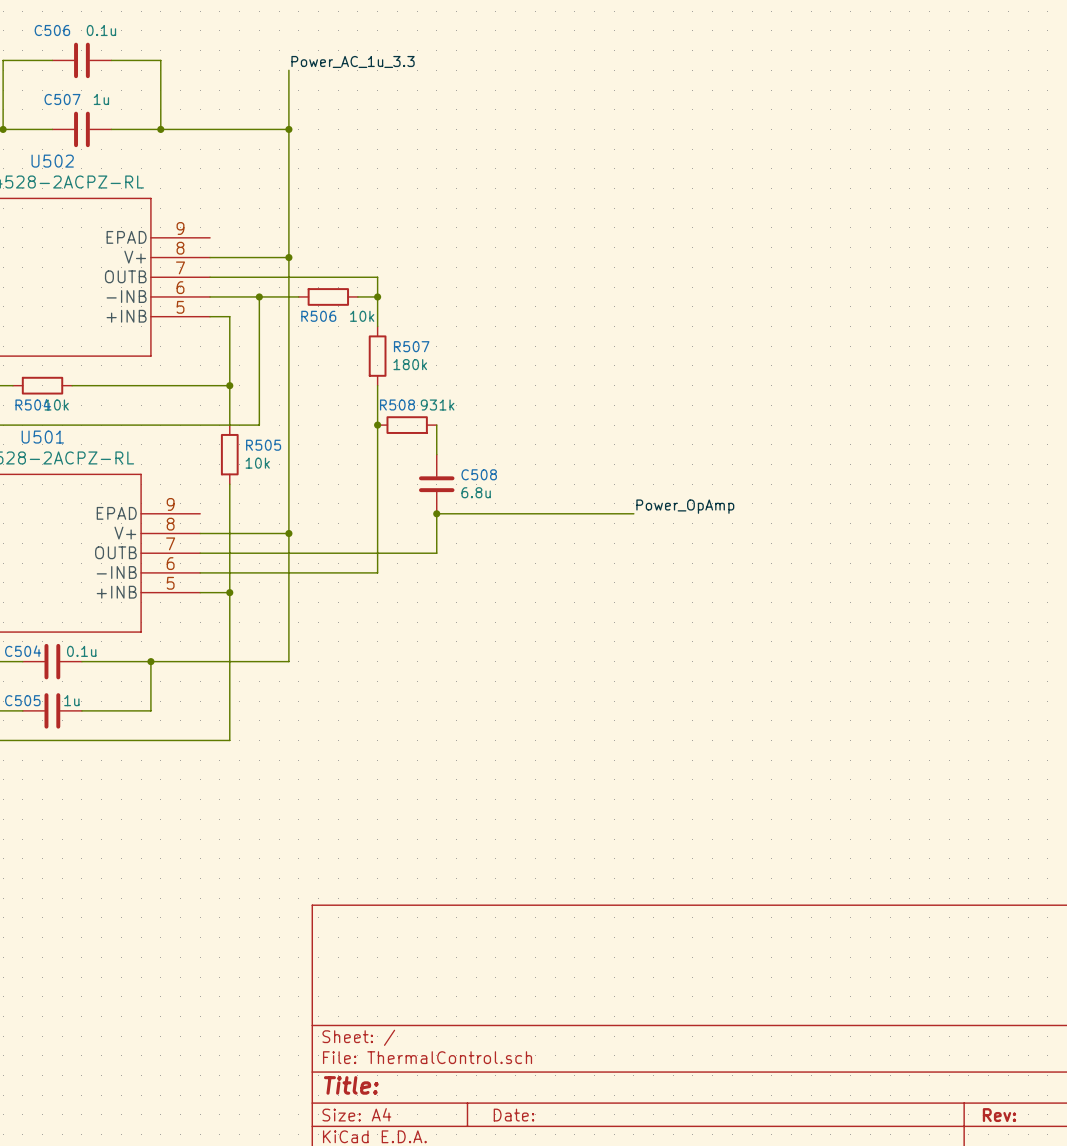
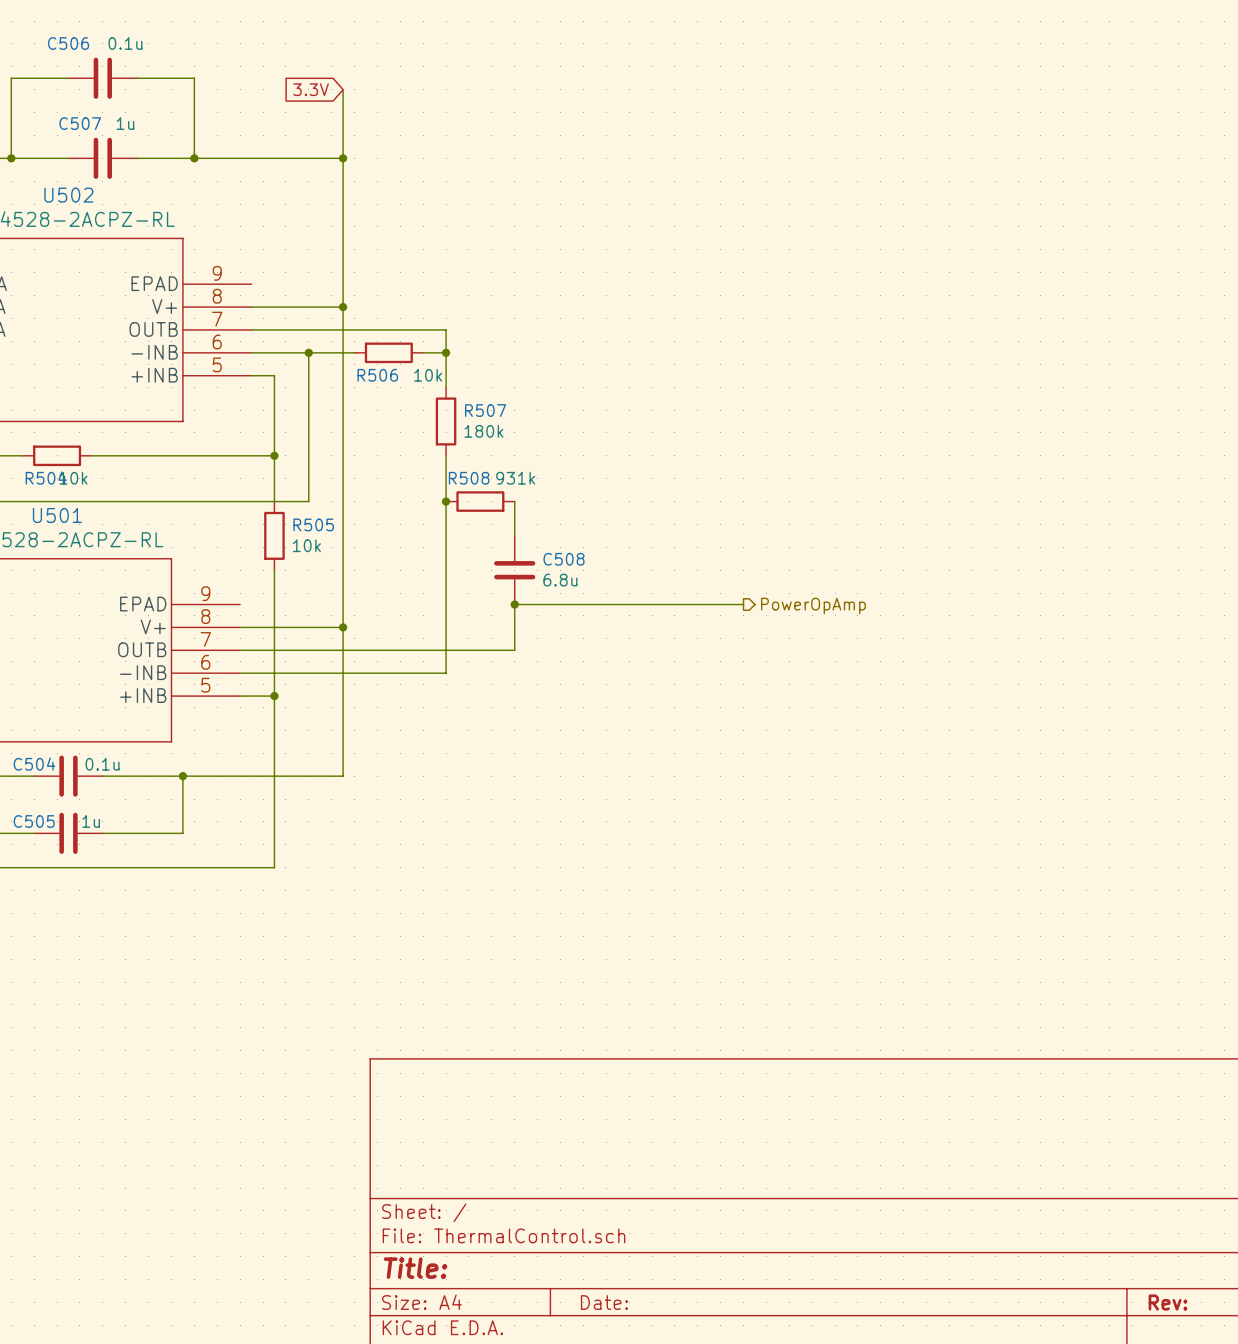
label: Power_AC_1u_3.3 (353, 61) -> none
global label: none -> 3.3V (311, 89)
label: Power_OpAmp (685, 506) -> none
hierarchical label: none -> PowerOpAmp (813, 606)

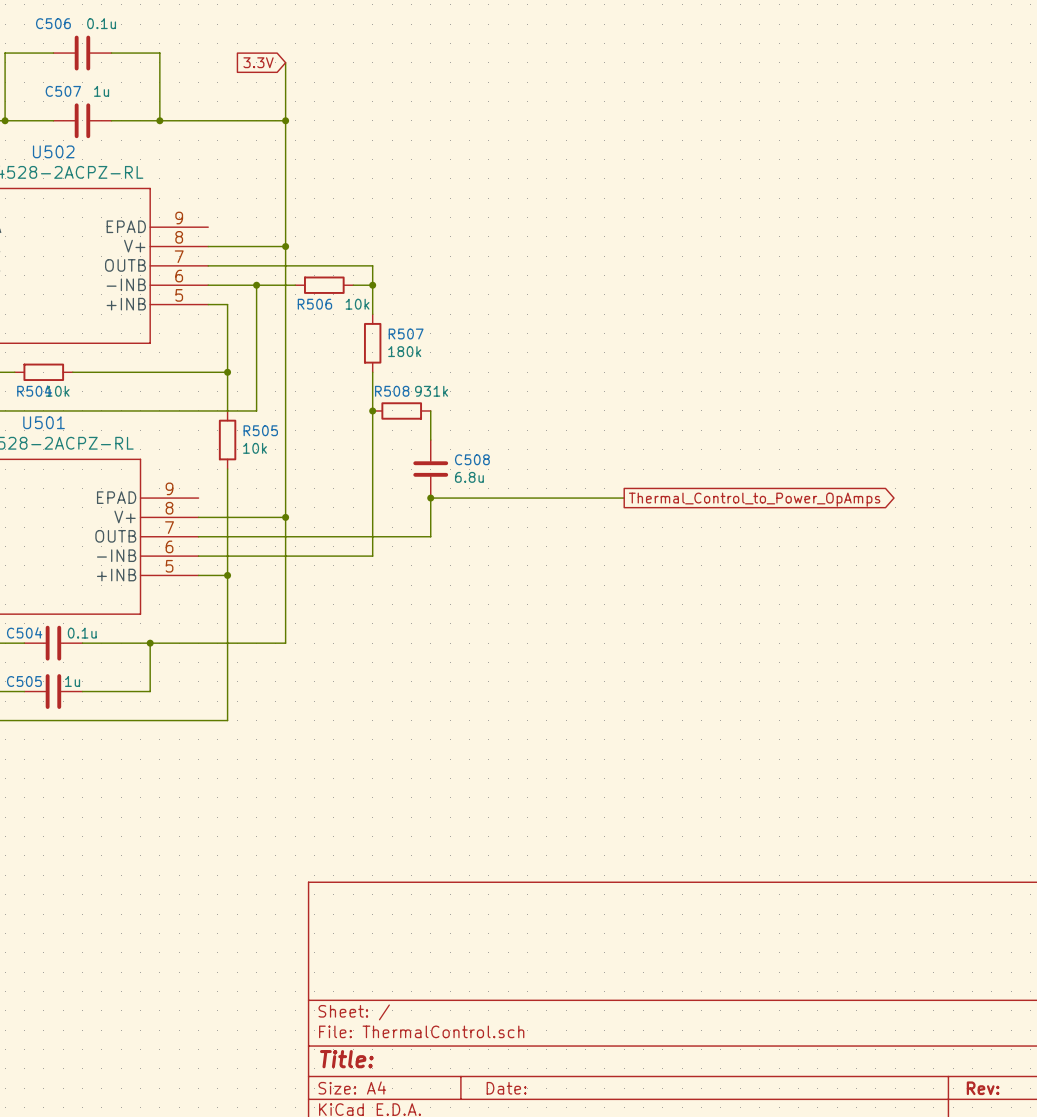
hierarchical label: PowerOpAmp (813, 606) -> none
global label: none -> Thermal_Control_to_Power_OpAmps (754, 499)

